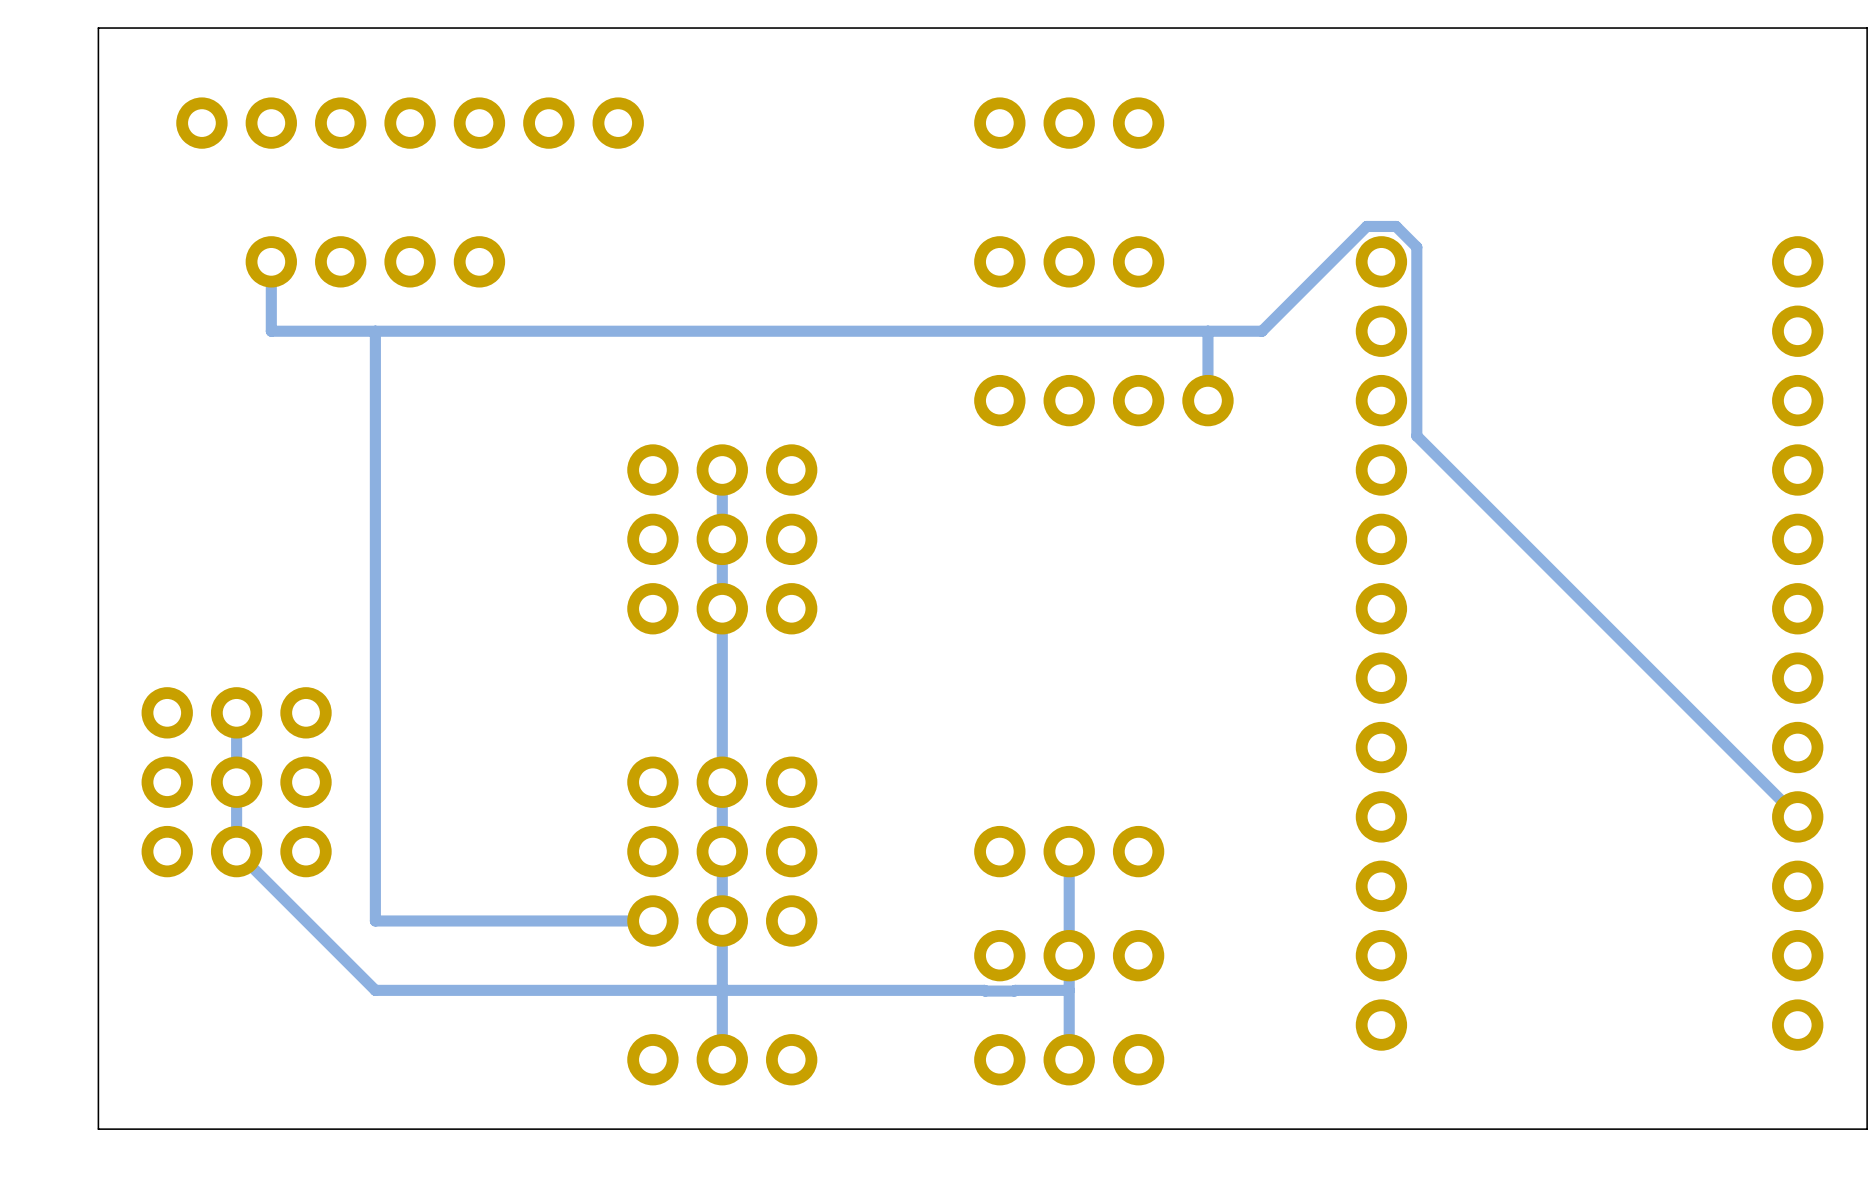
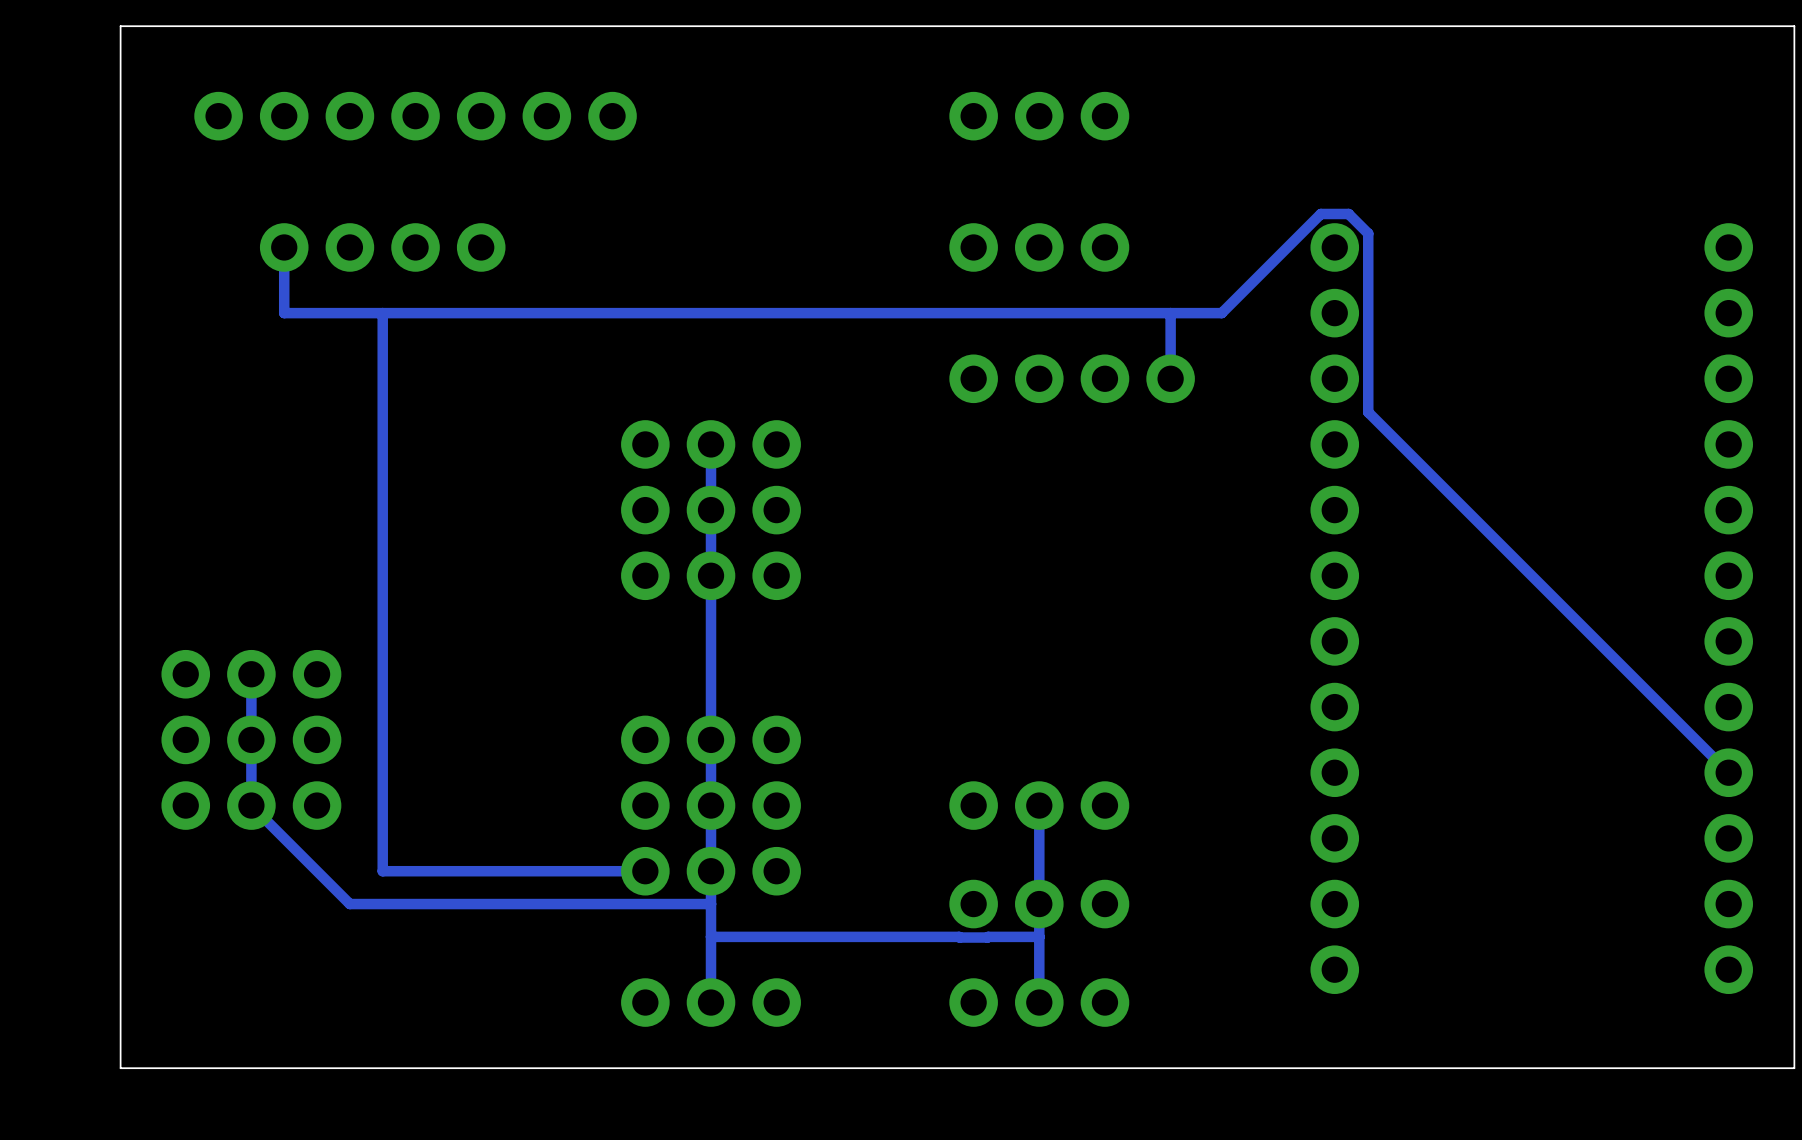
track: (340, 955) (375, 990) (722, 990) -> (349, 904) (711, 904)

